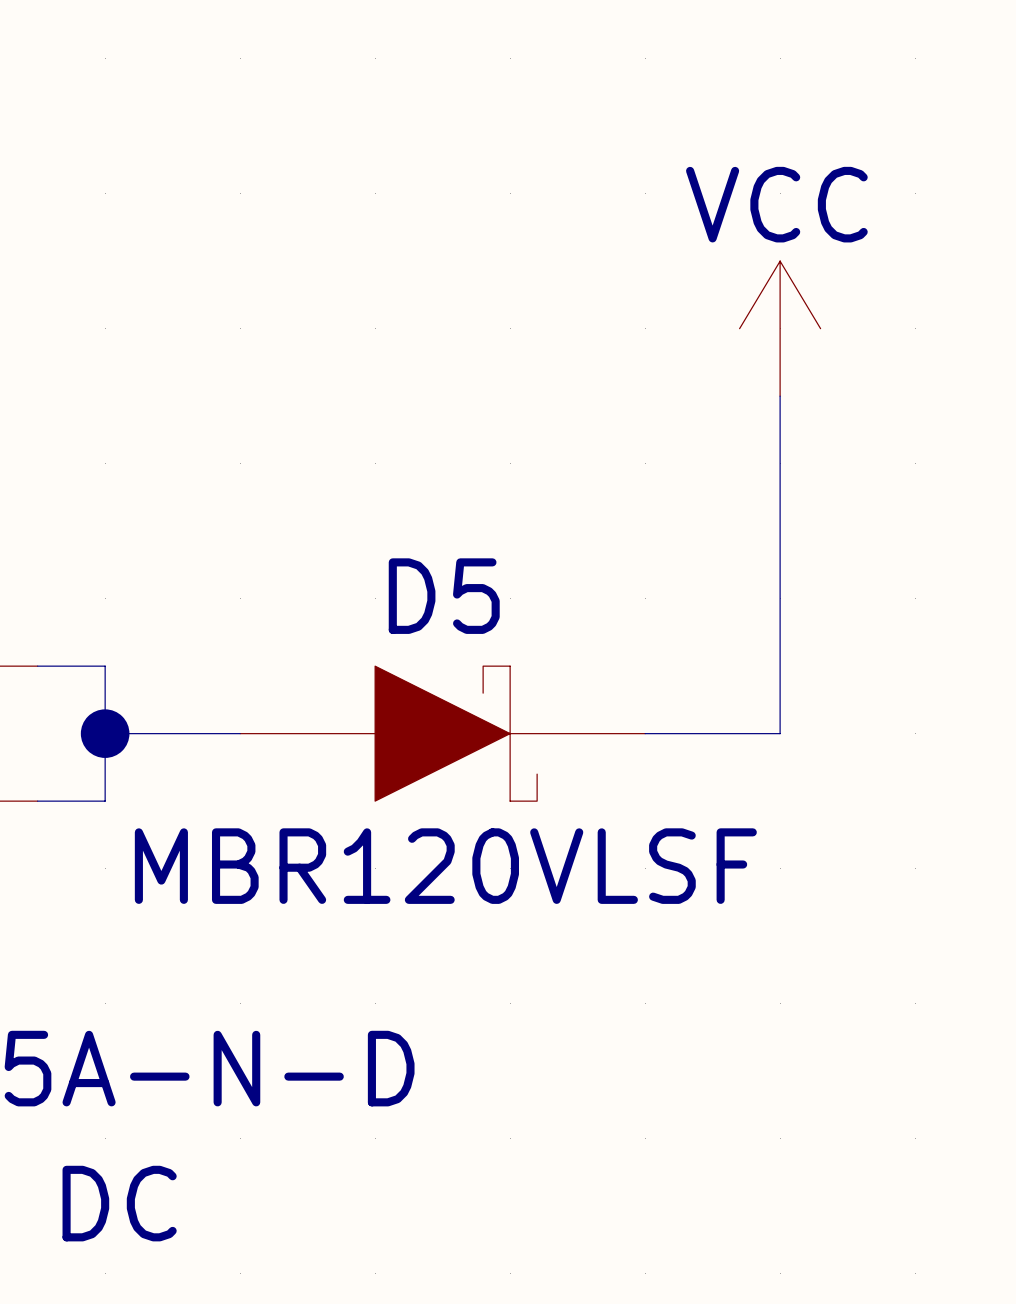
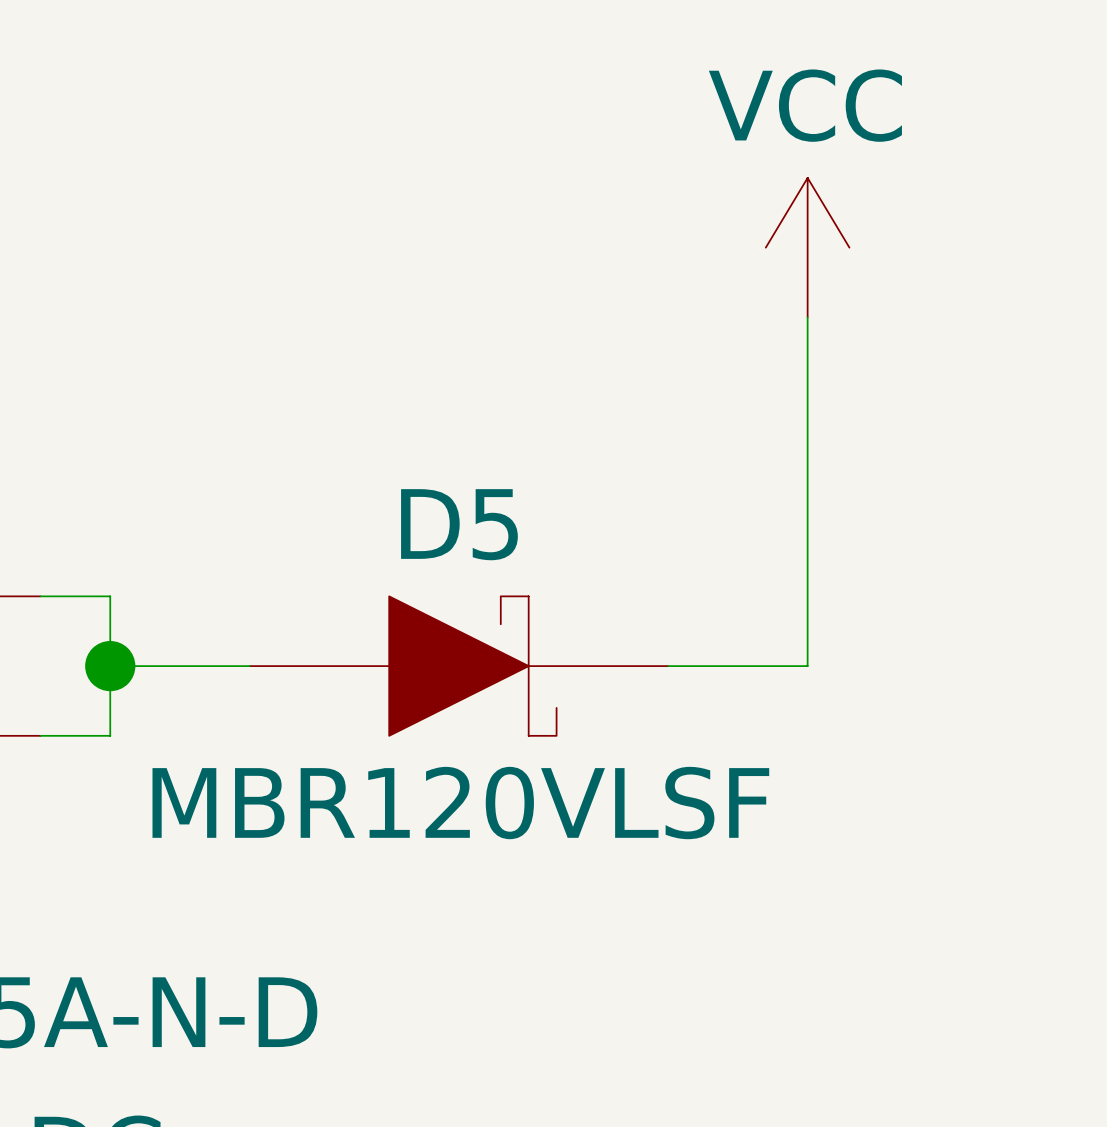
power symbol text position: VCC (776, 204) -> VCC (805, 105)

